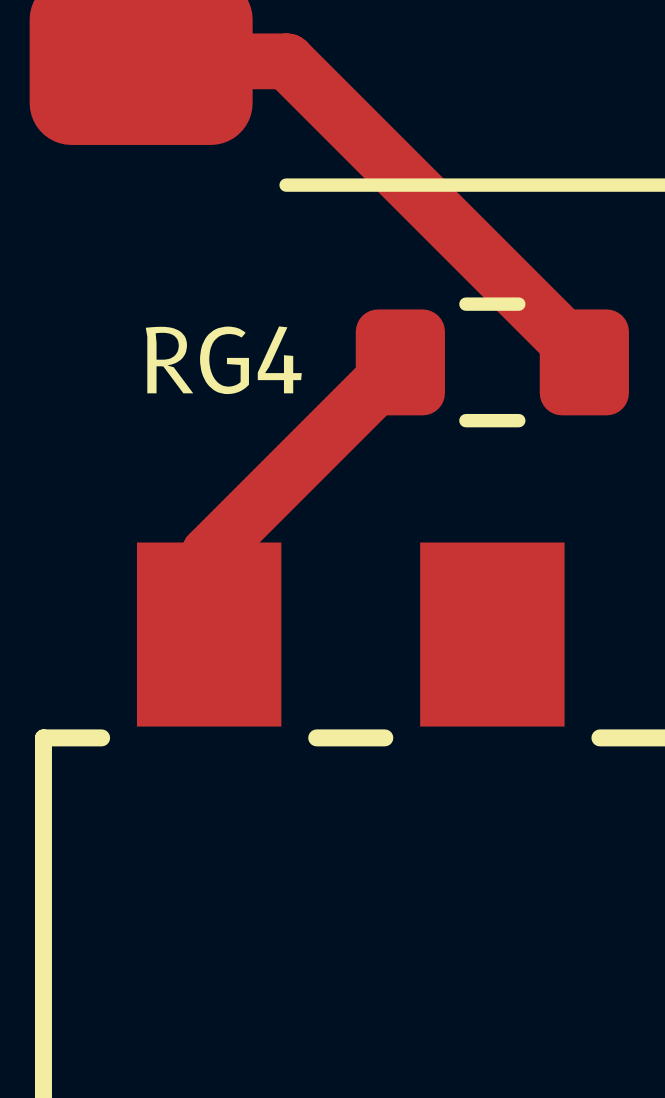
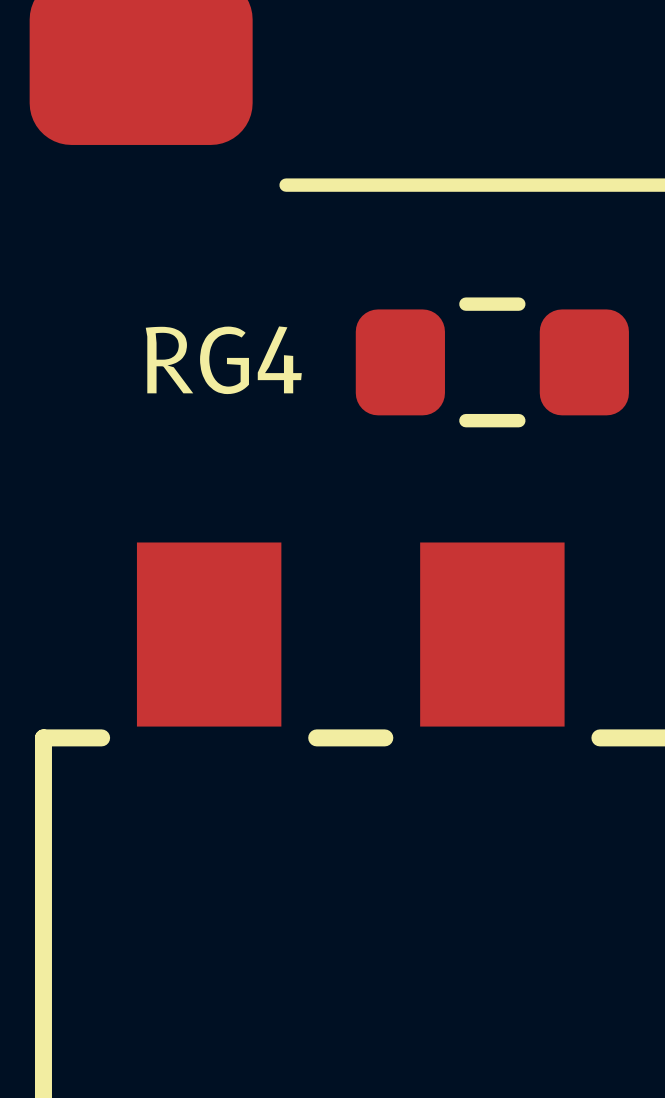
track: (141, 61) (286, 61) (584, 358) (584, 362) -> none
track: (400, 362) (209, 553) (209, 634) -> none

